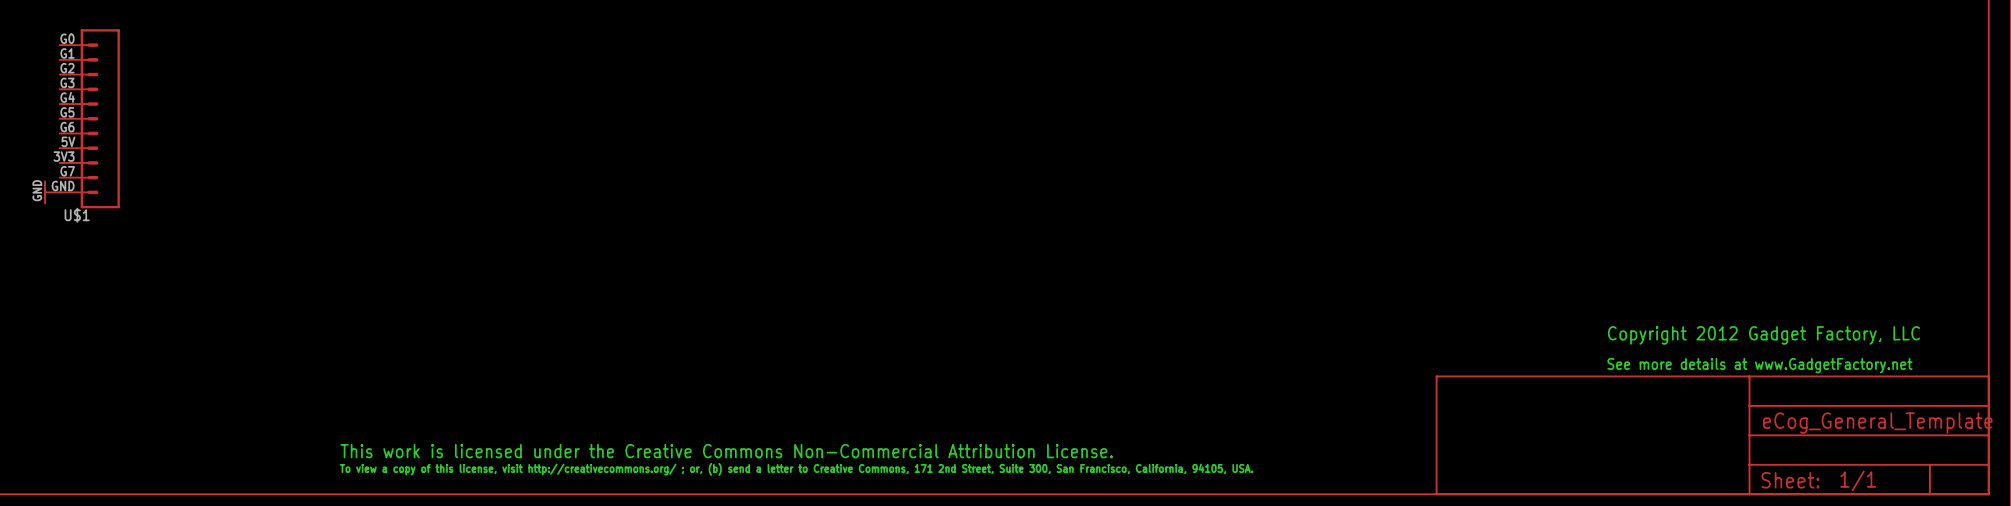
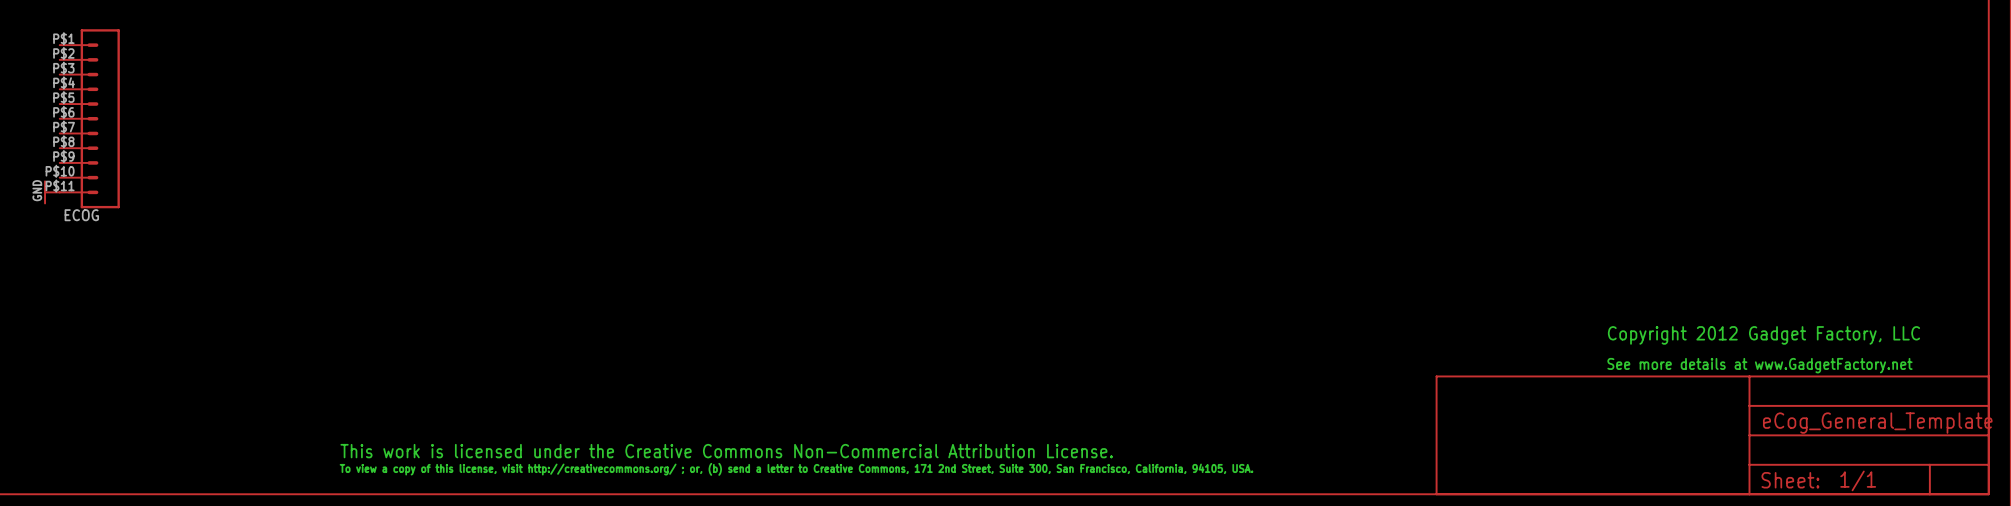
U$1 symbol: [59, 29, 120, 209] -> [59, 29, 120, 209]
U$1 name: U$1 (77, 215) -> ECOG (81, 215)

